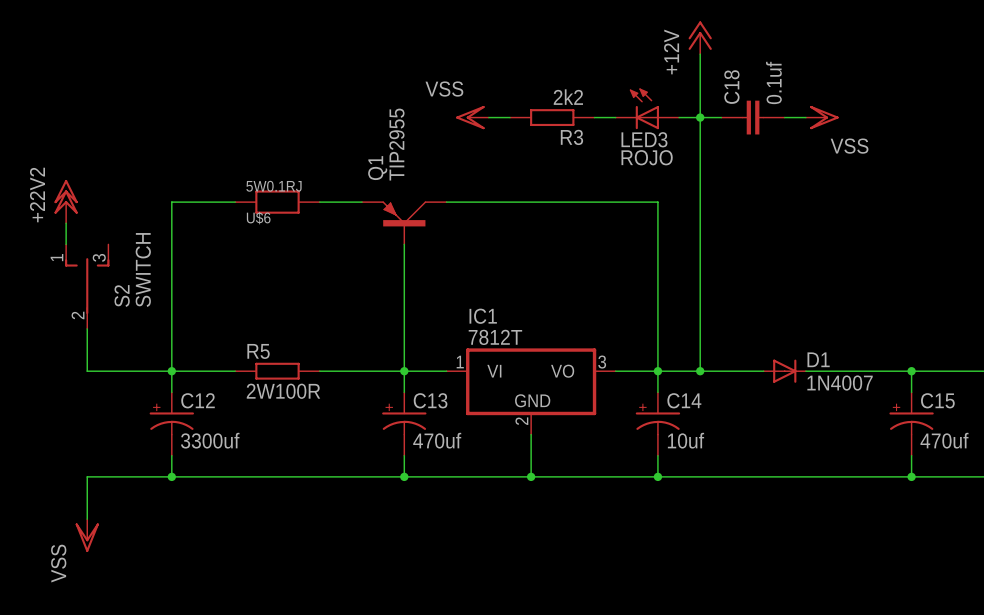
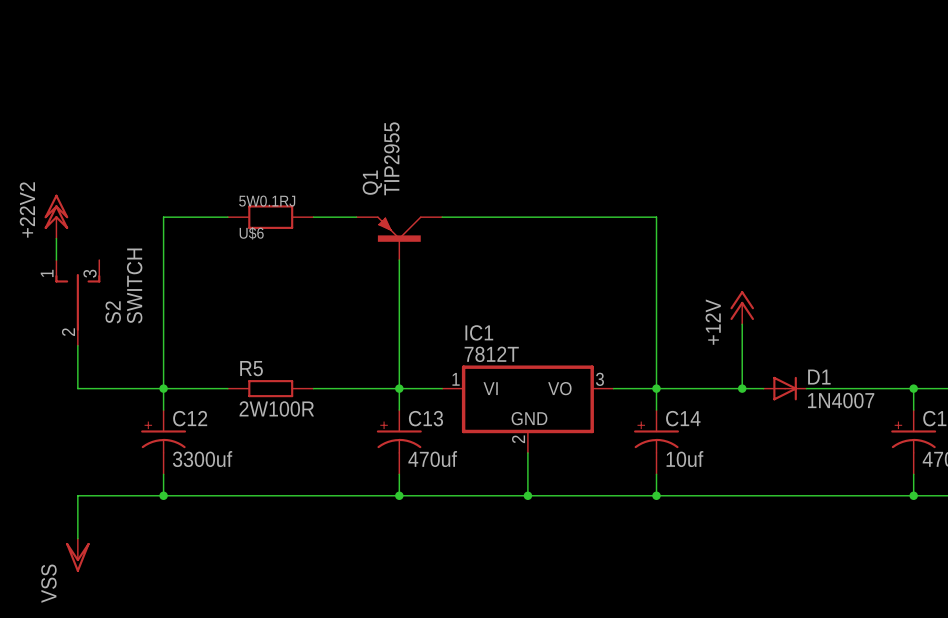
power symbol: +12V (700, 37) -> none
wire: (700, 54) (700, 371) -> none
LED3: ROJO (647, 108) -> none
power symbol: VSS (472, 117) -> none
wire: (488, 117) (509, 117) -> none
R3: 2k2 (552, 117) -> none
wire: (594, 117) (615, 117) -> none
wire: (679, 117) (721, 117) -> none
junction: (700, 117) -> none
C18: 0.1uf (753, 117) -> none
wire: (784, 117) (805, 117) -> none
power symbol: VSS (822, 117) -> none
power symbol: none -> +12V (742, 307)
wire: none -> (742, 324) (742, 388)
junction position: (700, 371) -> (742, 388)

